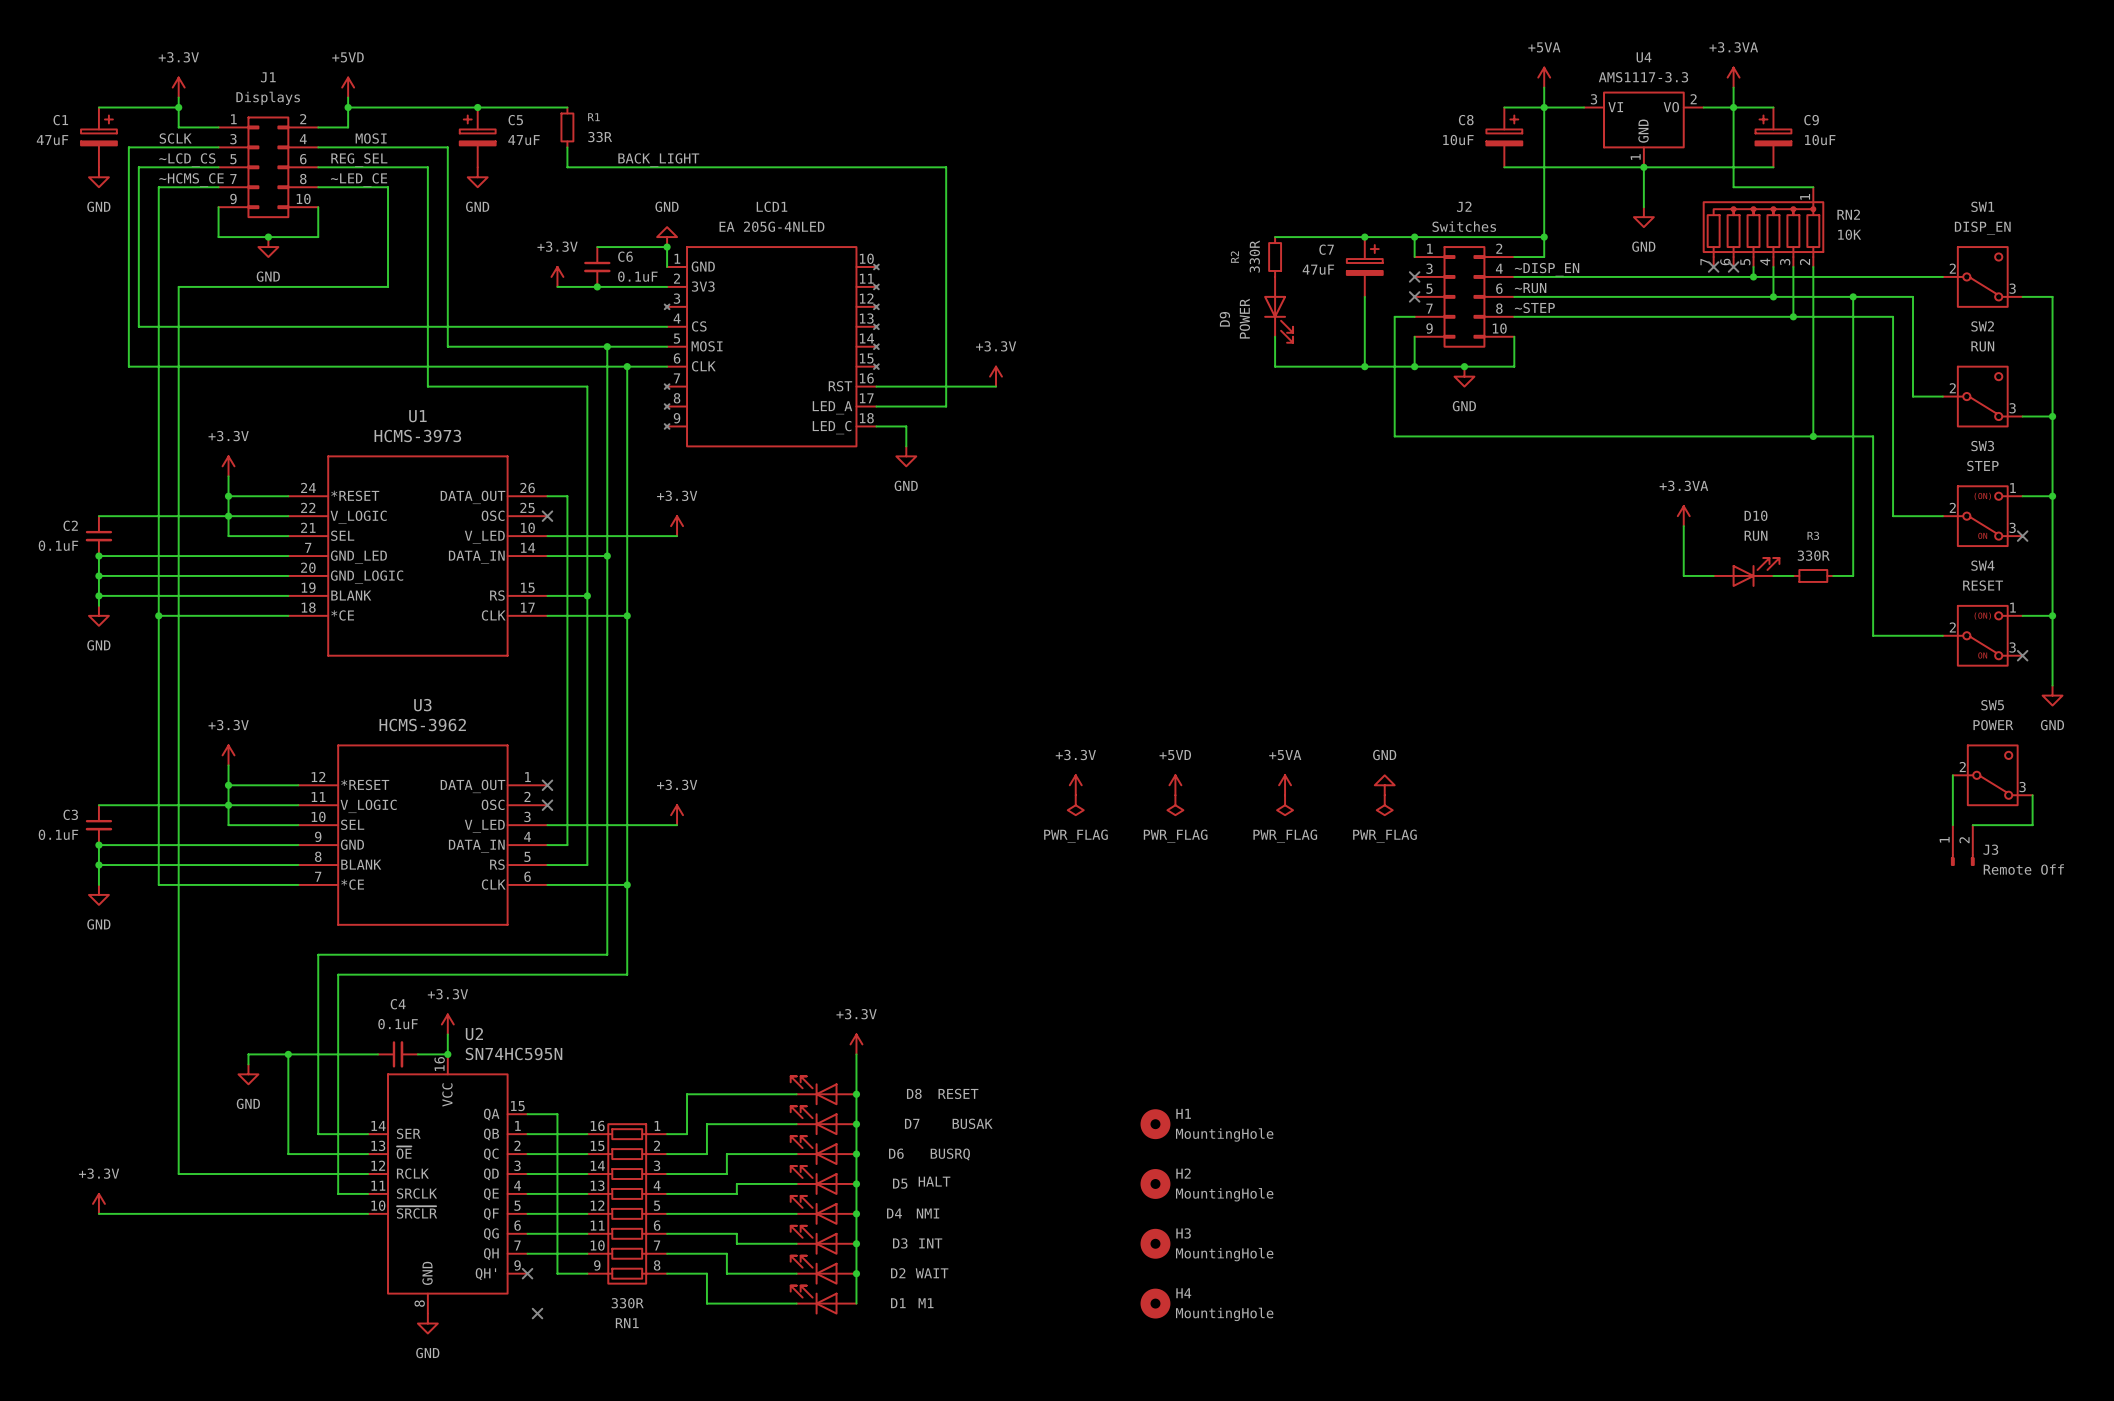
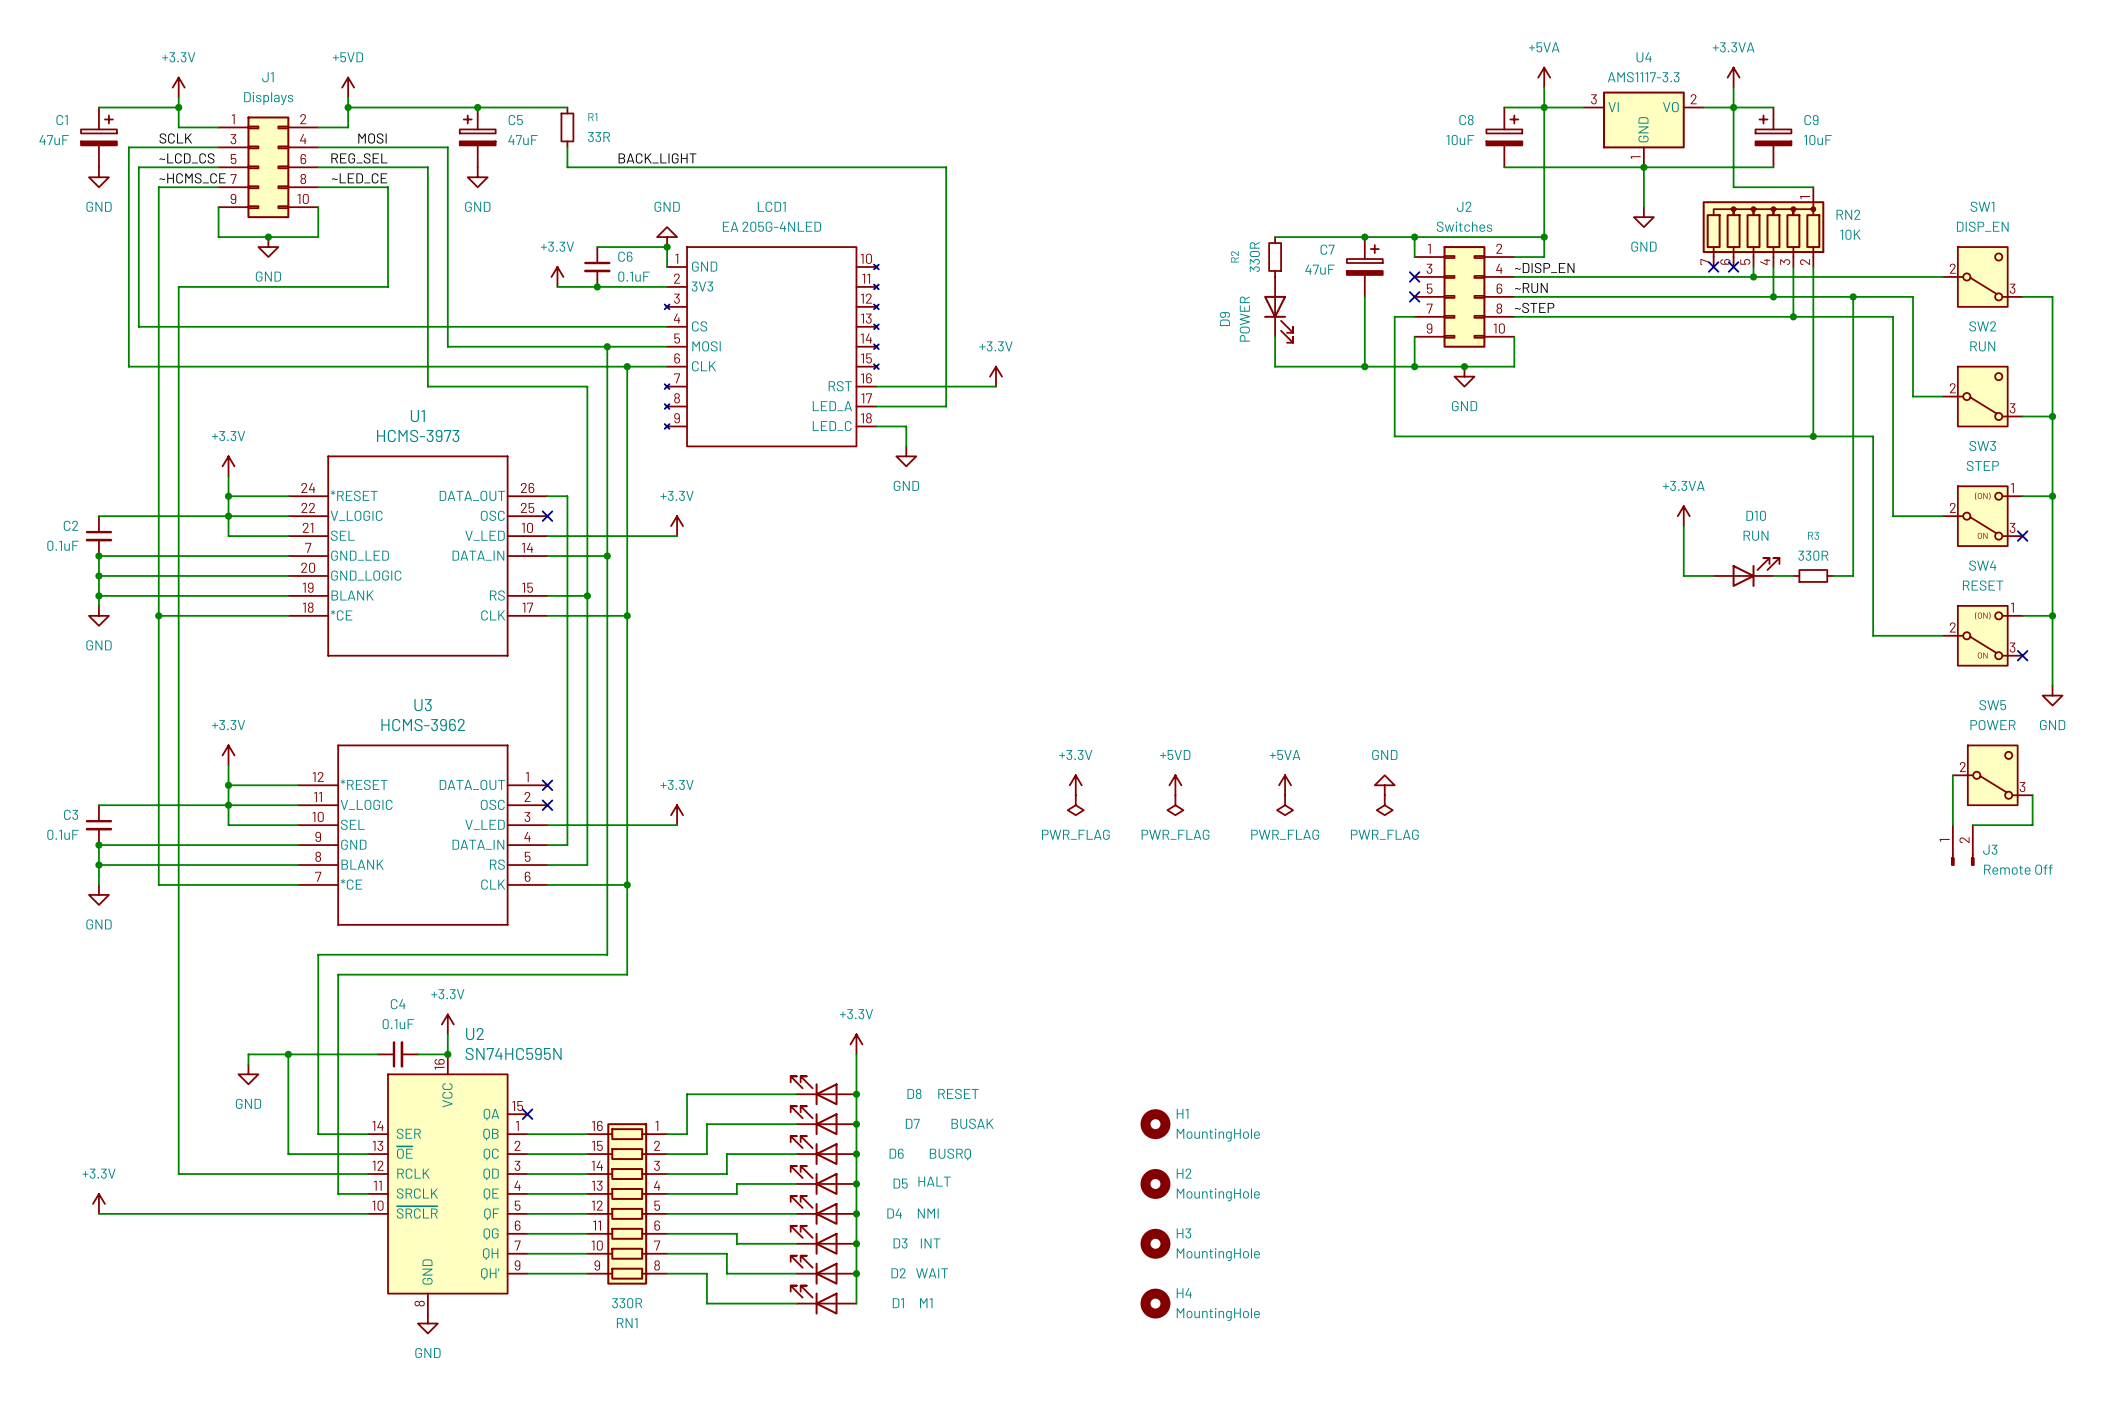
wire: (527, 1114) (557, 1114) (557, 1273) -> (527, 1273) (557, 1273)
no-connect mark: none -> (527, 1114)
no-connect mark: (527, 1273) -> none
no-connect mark: (537, 1313) -> none

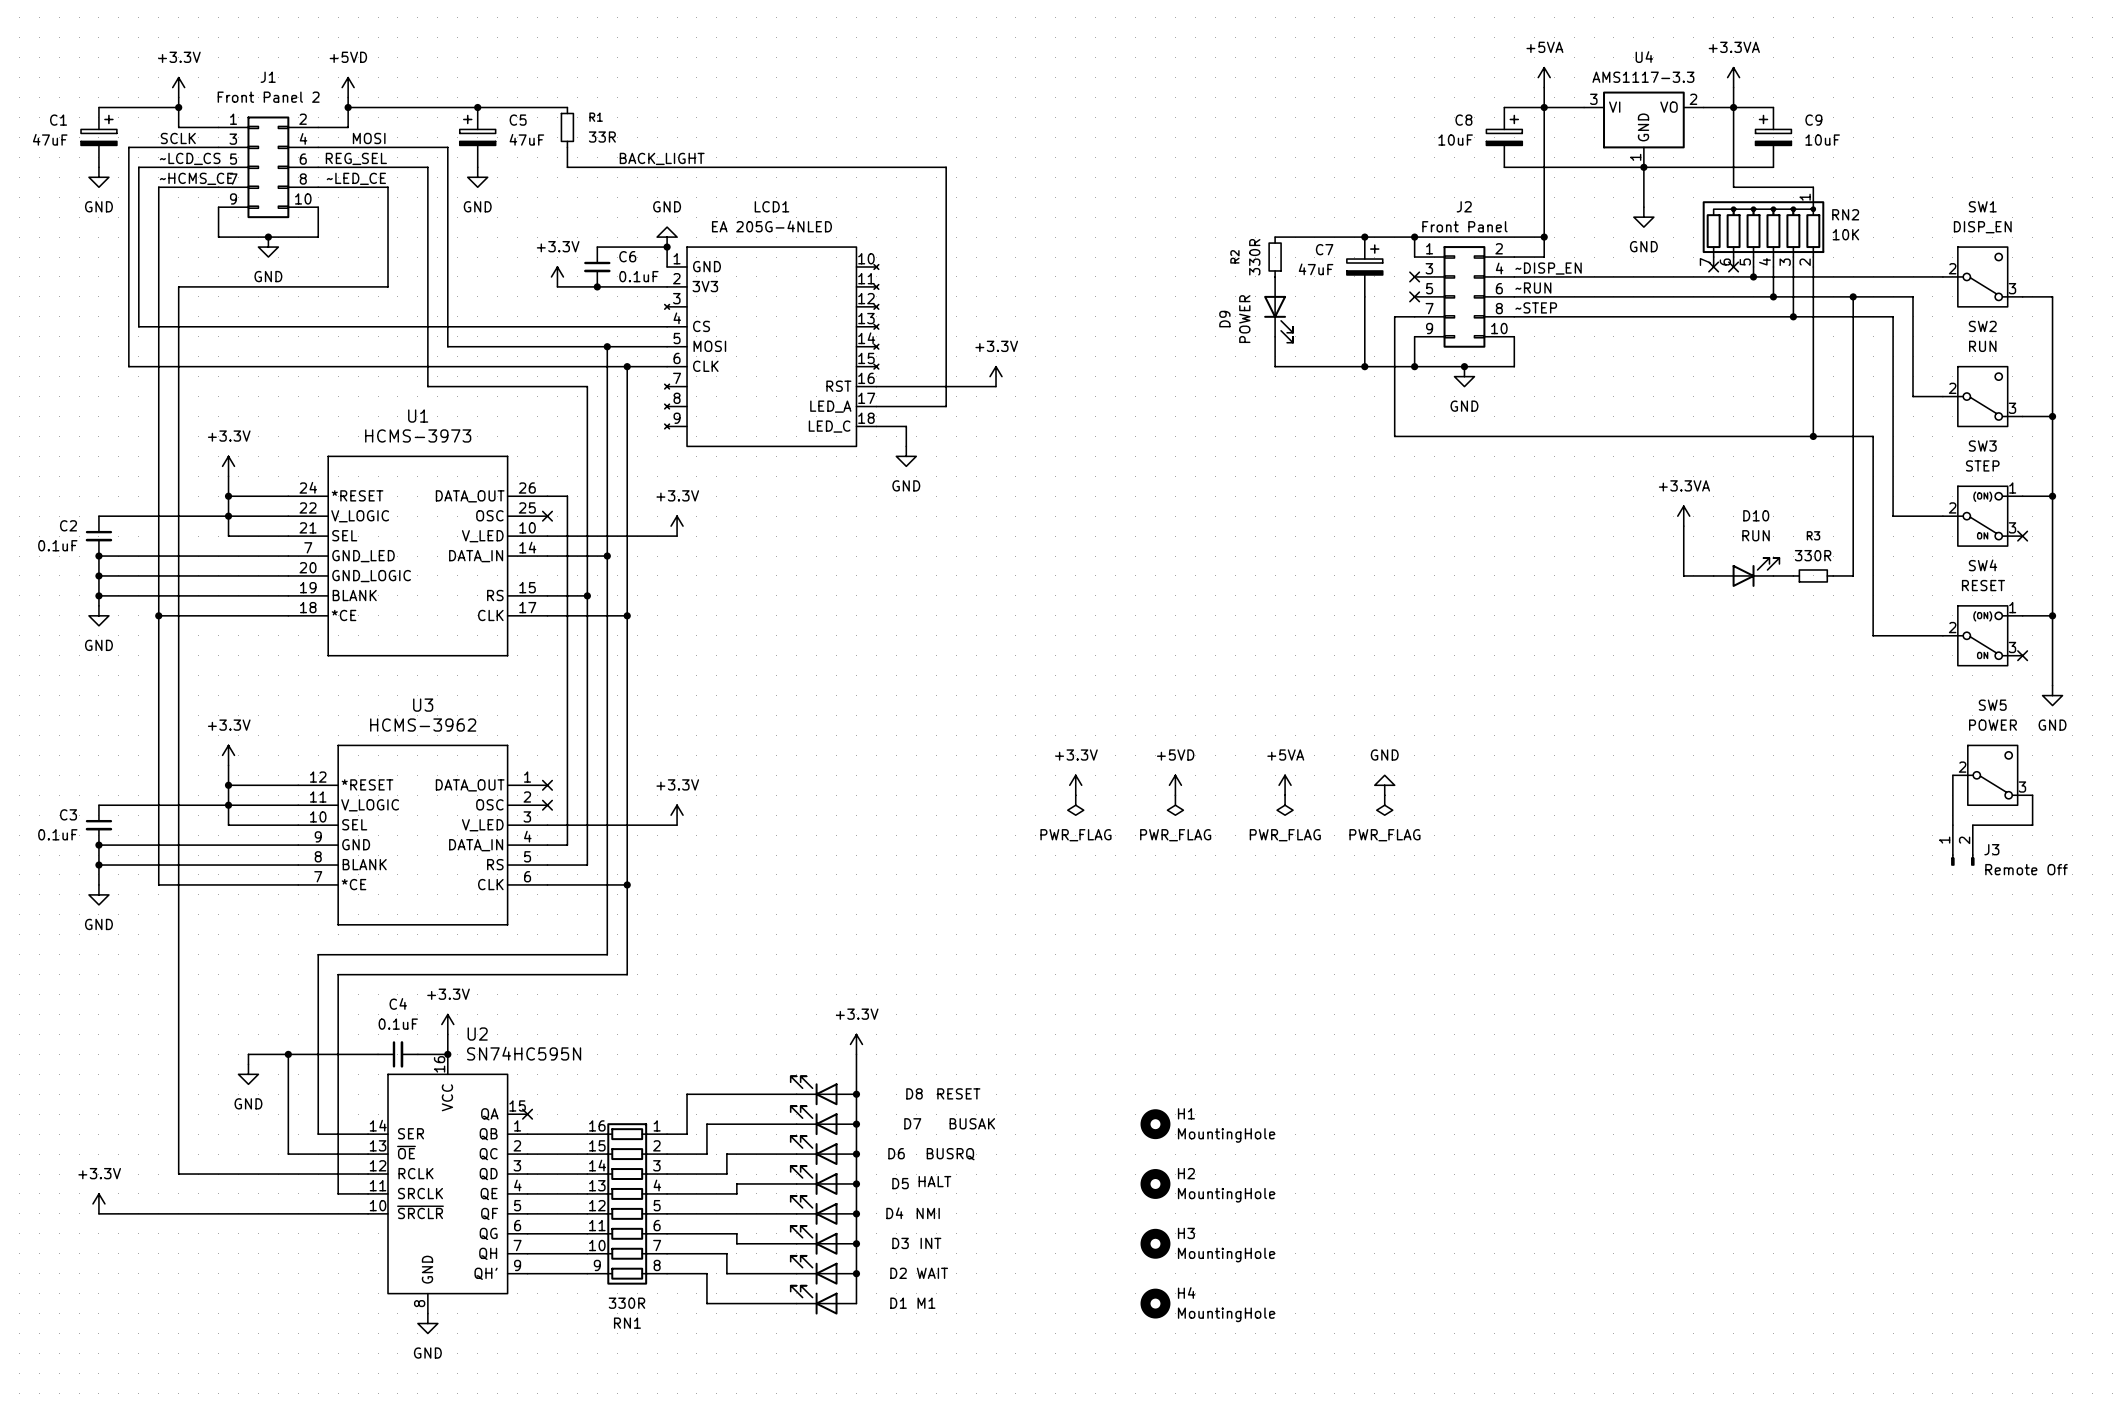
J1 value: Displays (268, 98) -> Front Panel 2 (268, 97)
J2 value: Switches (1464, 226) -> Front Panel (1464, 226)

